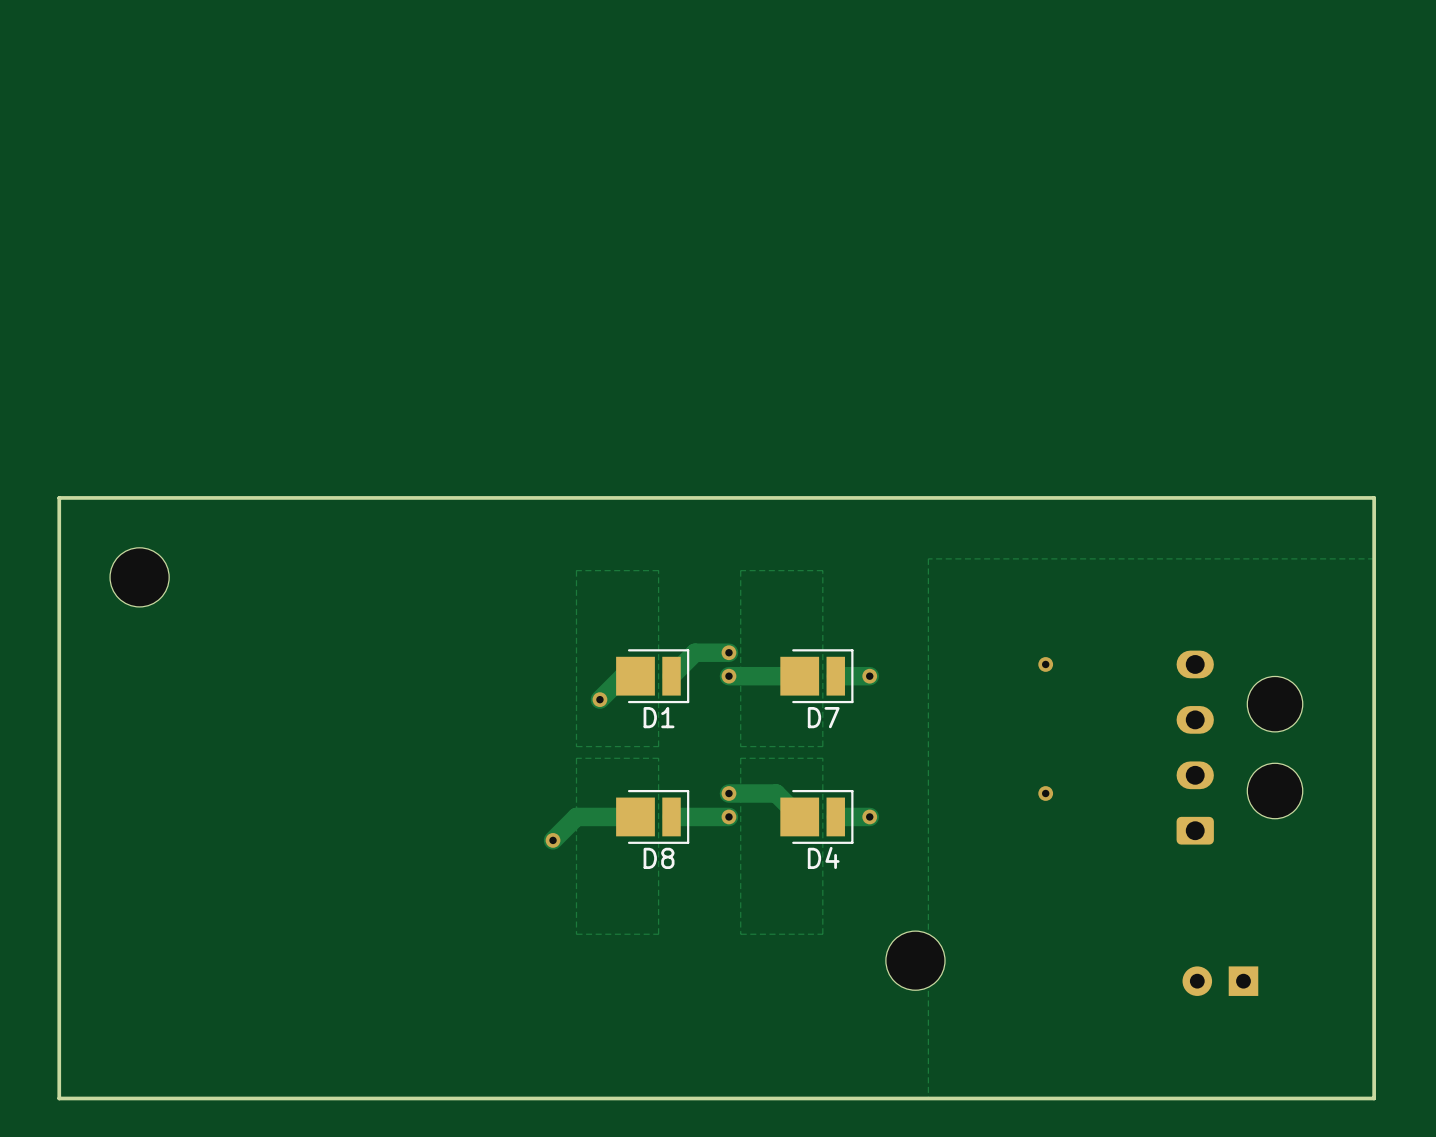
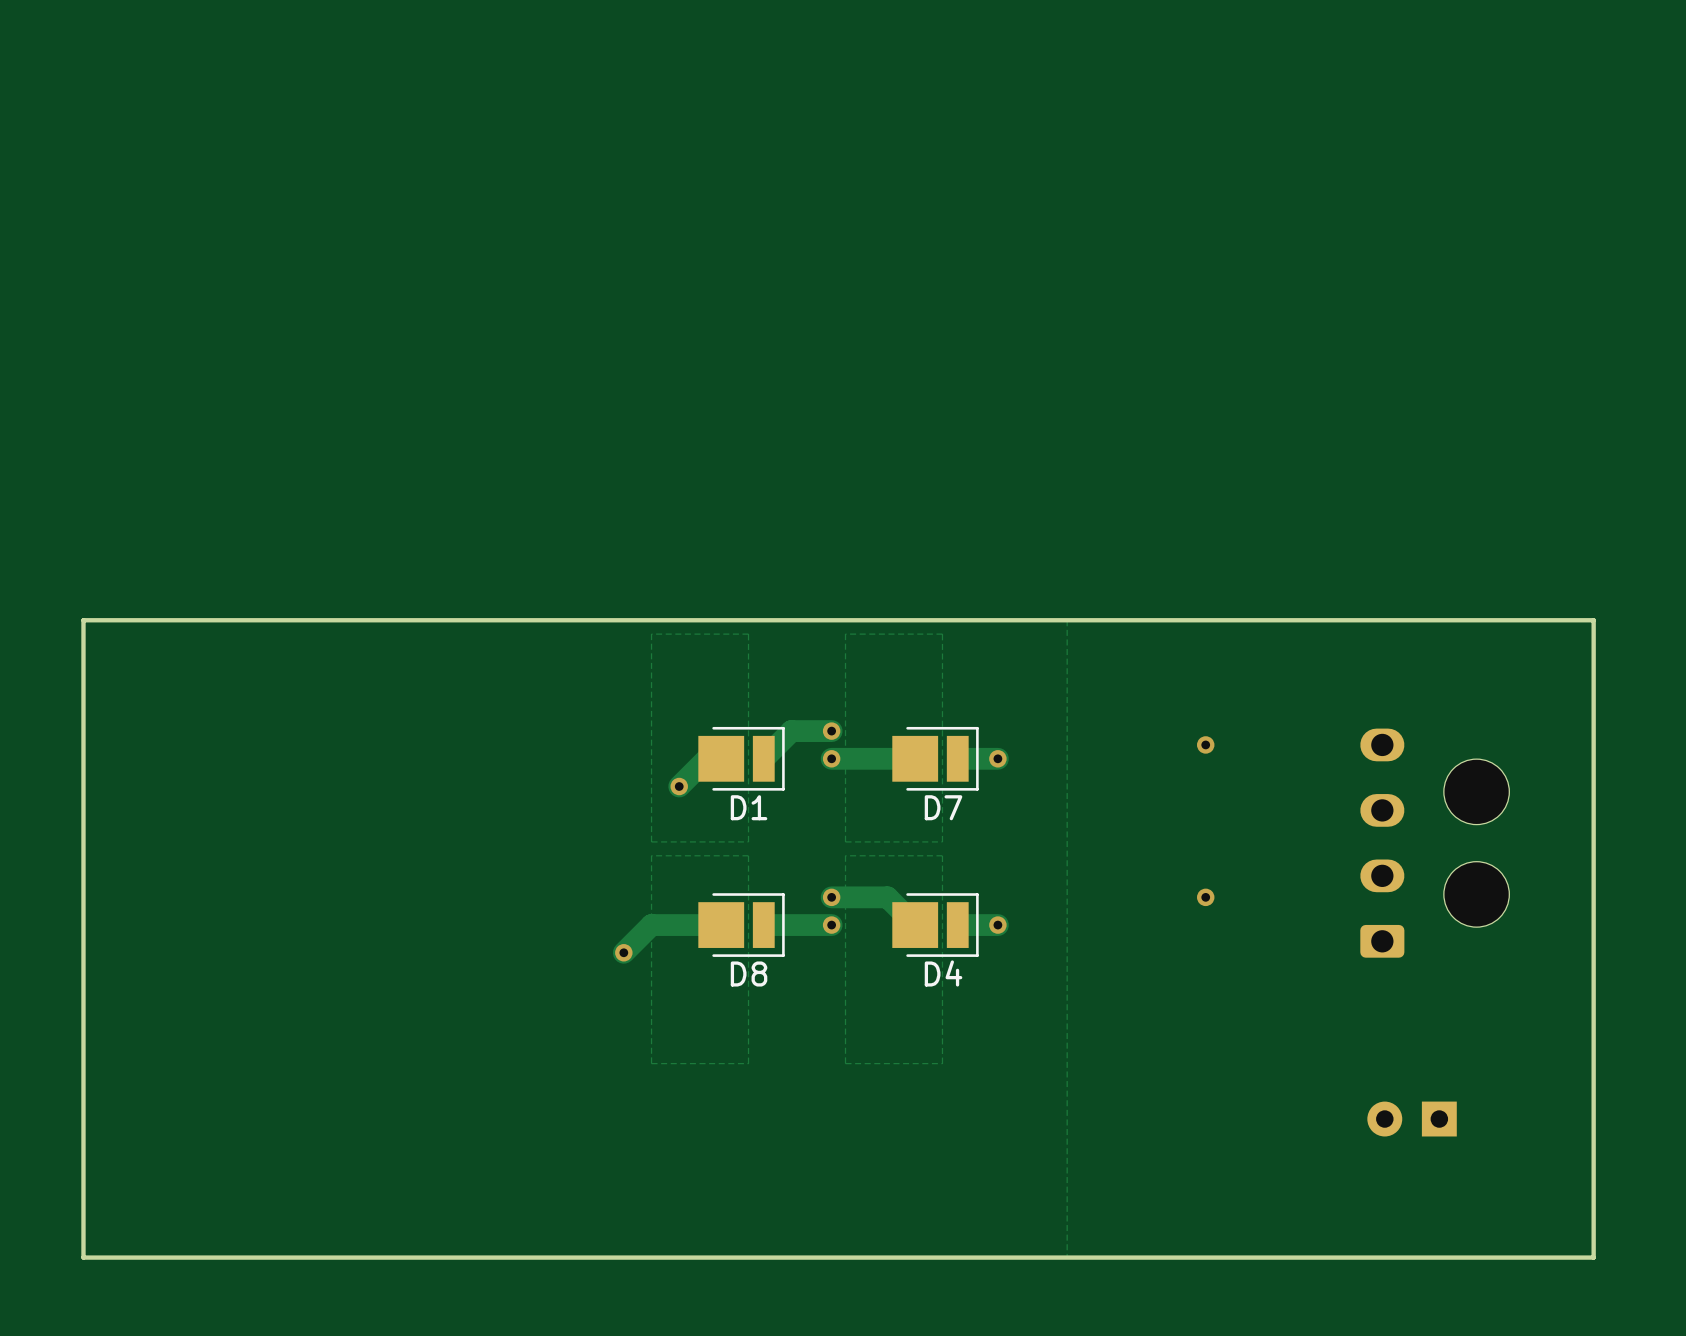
board edge: (1374, 558) (1374, 497) (59, 497) (59, 1098) (95, 1098) -> (1593, 620) (83, 620) (83, 1257)
part: (139, 577) -> none
part: (915, 960) -> none

